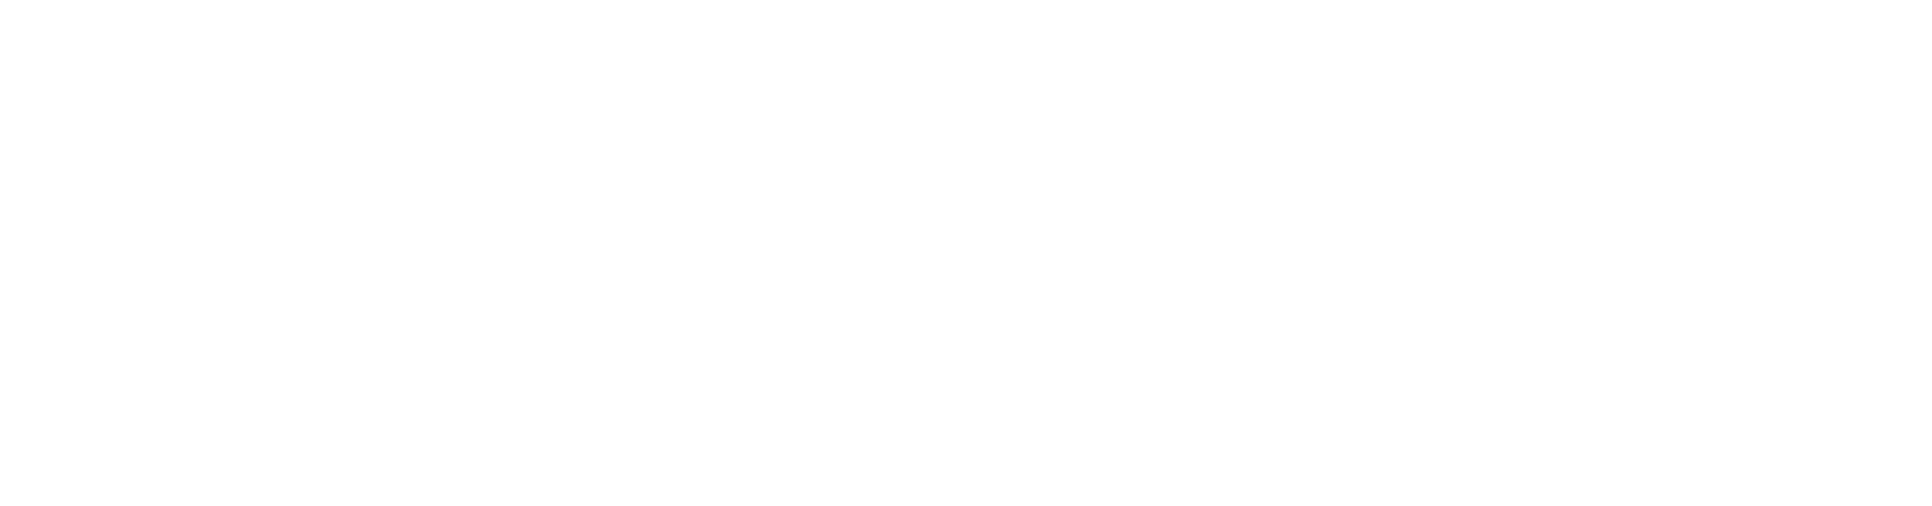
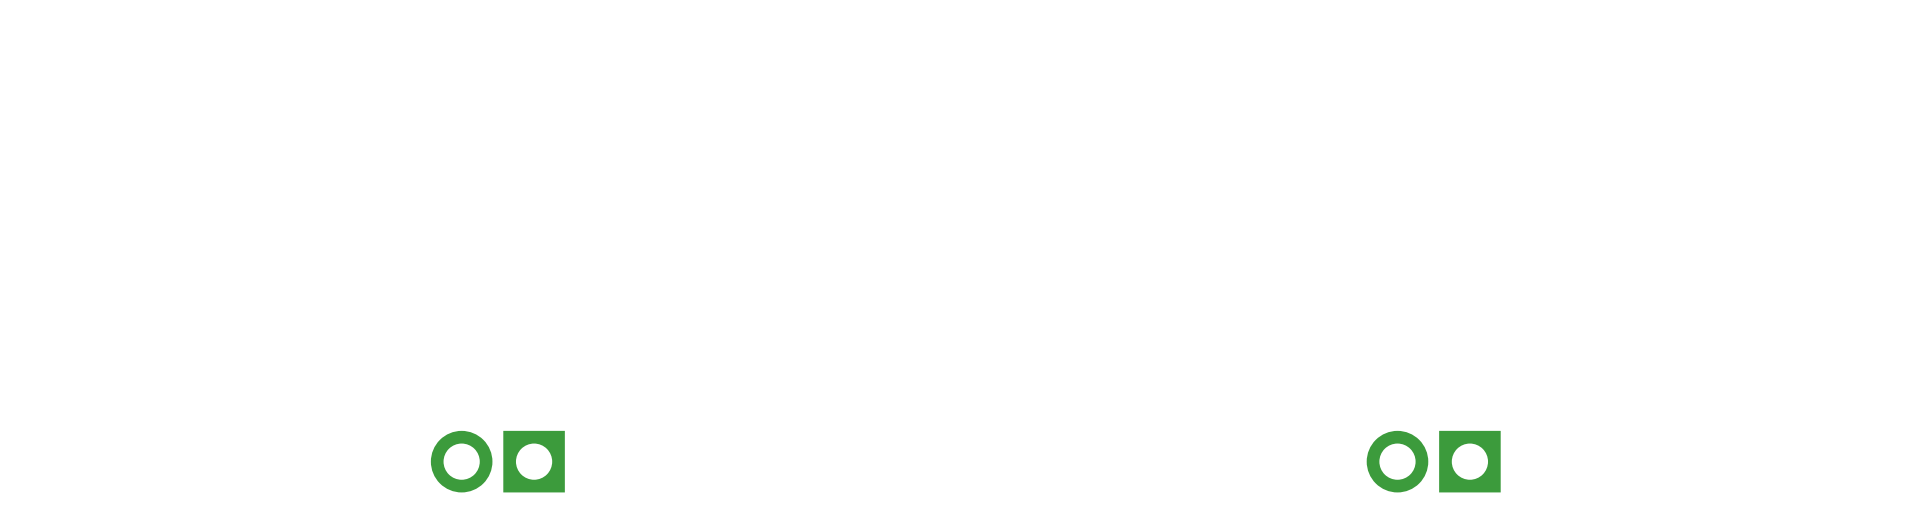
part: none -> (497, 461)
part: none -> (1433, 461)

